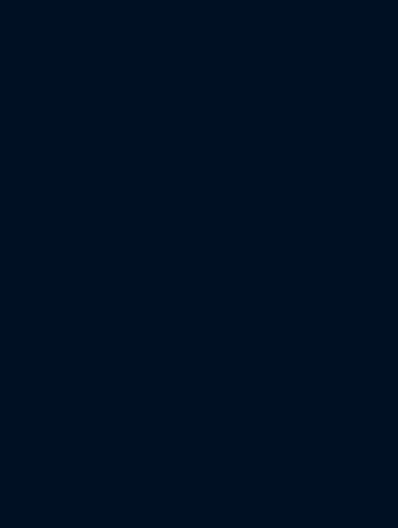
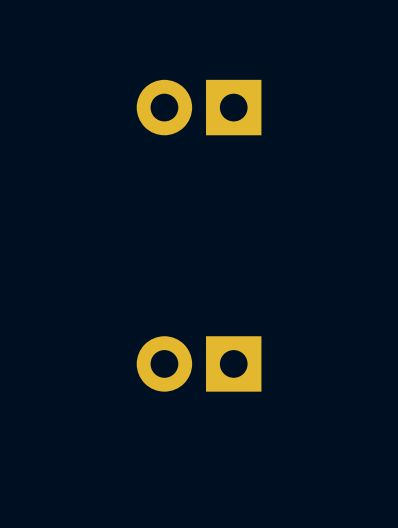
part: none -> (199, 107)
part: none -> (199, 363)

